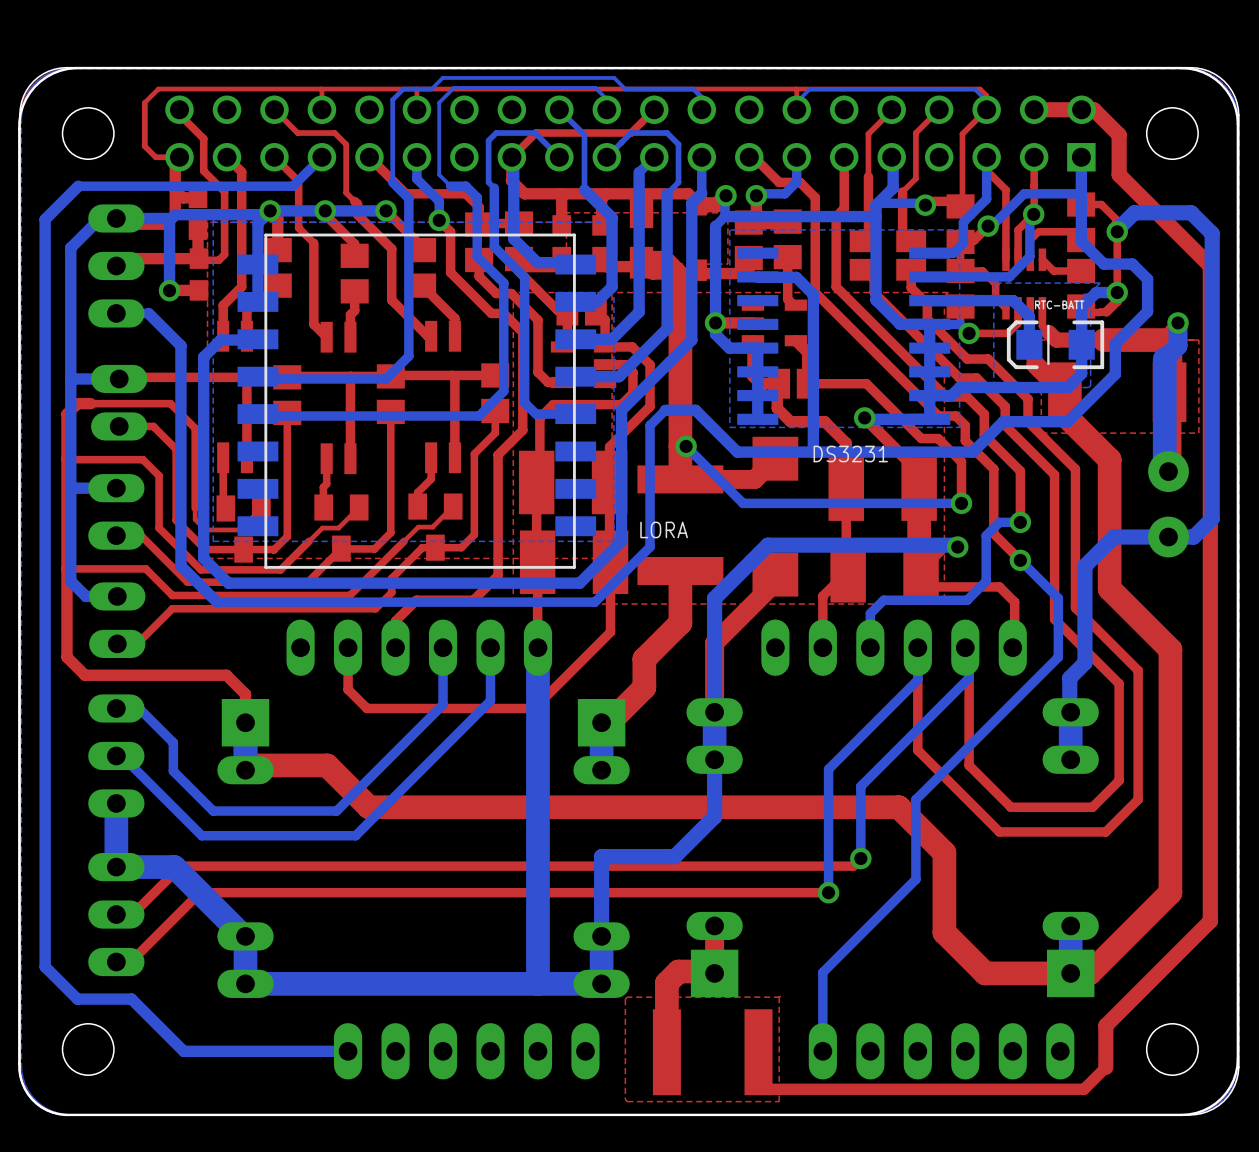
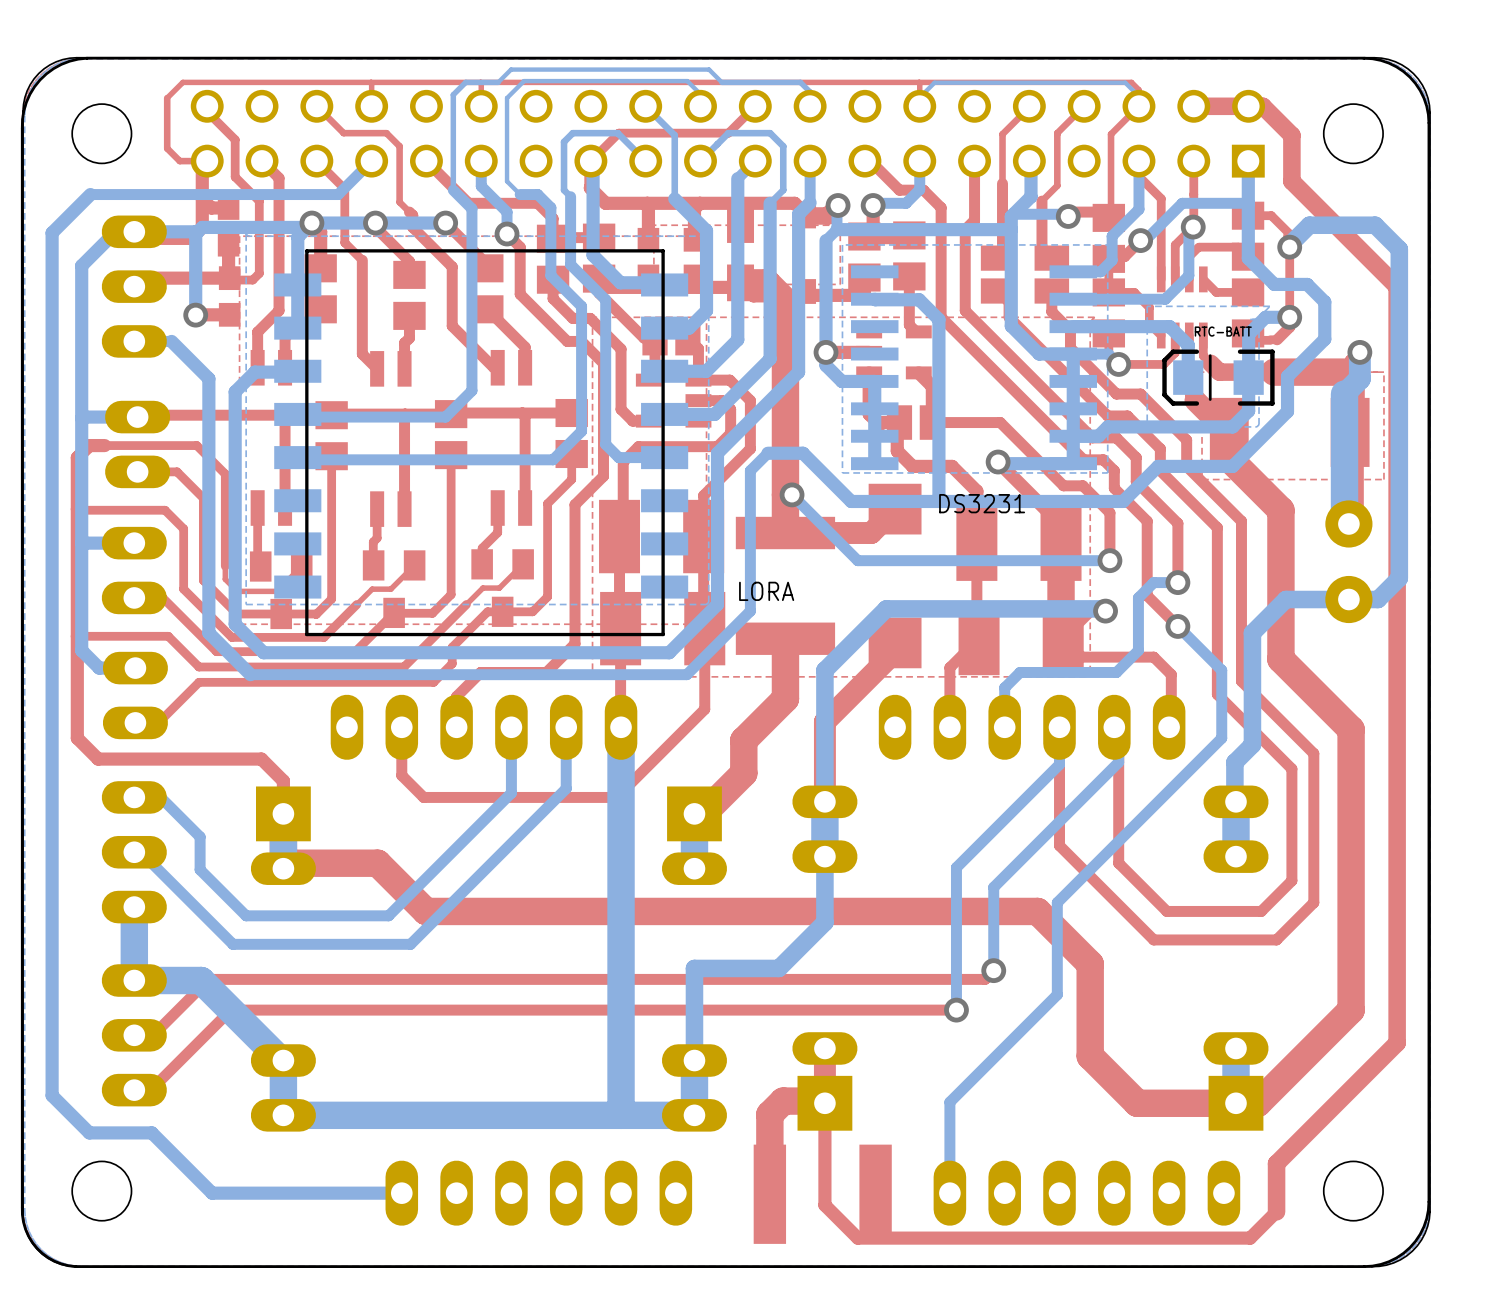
top zone outline: (780, 996) (779, 997) (779, 1101) (627, 1101) (625, 1099) (625, 999) (627, 997) (780, 996) -> none
top track: (758, 1052) (757, 1089) (1084, 1089) -> (824, 1103) (824, 1205) (857, 1238) (1251, 1237)

